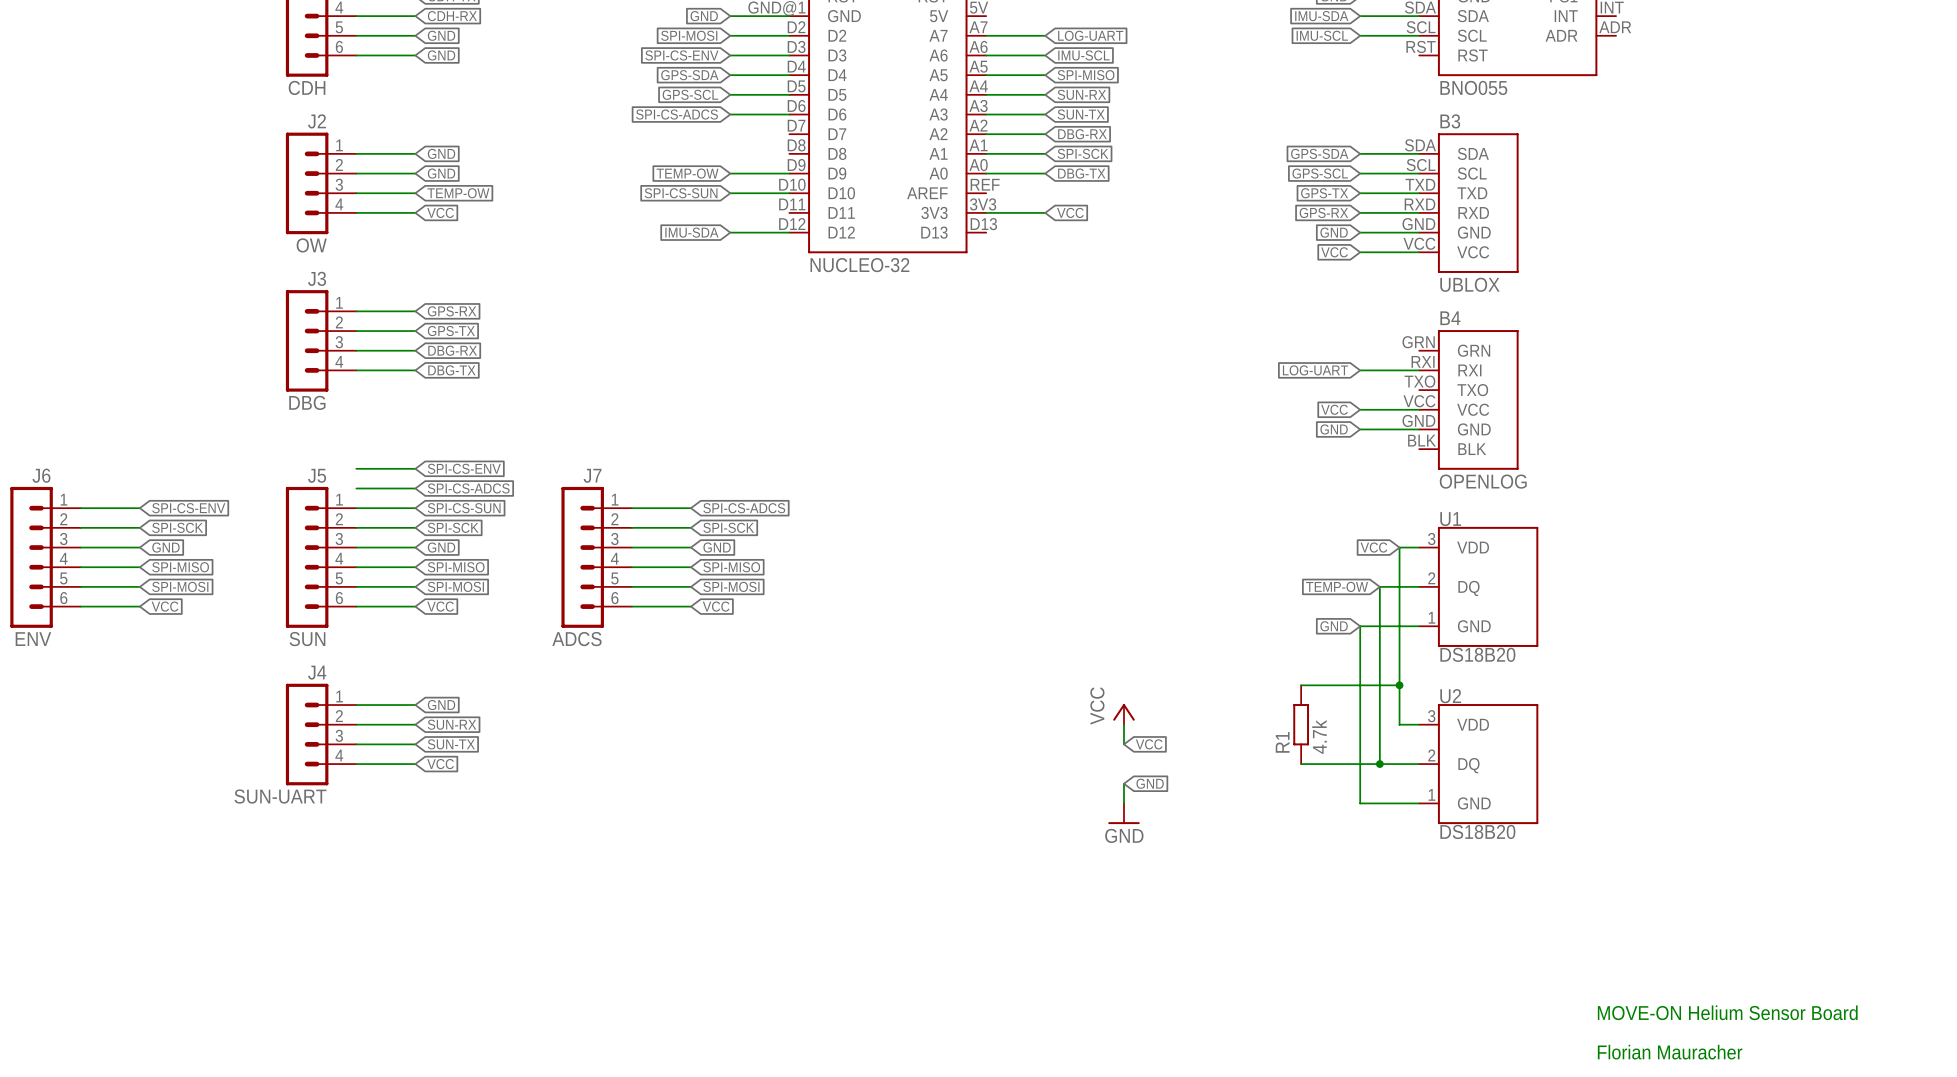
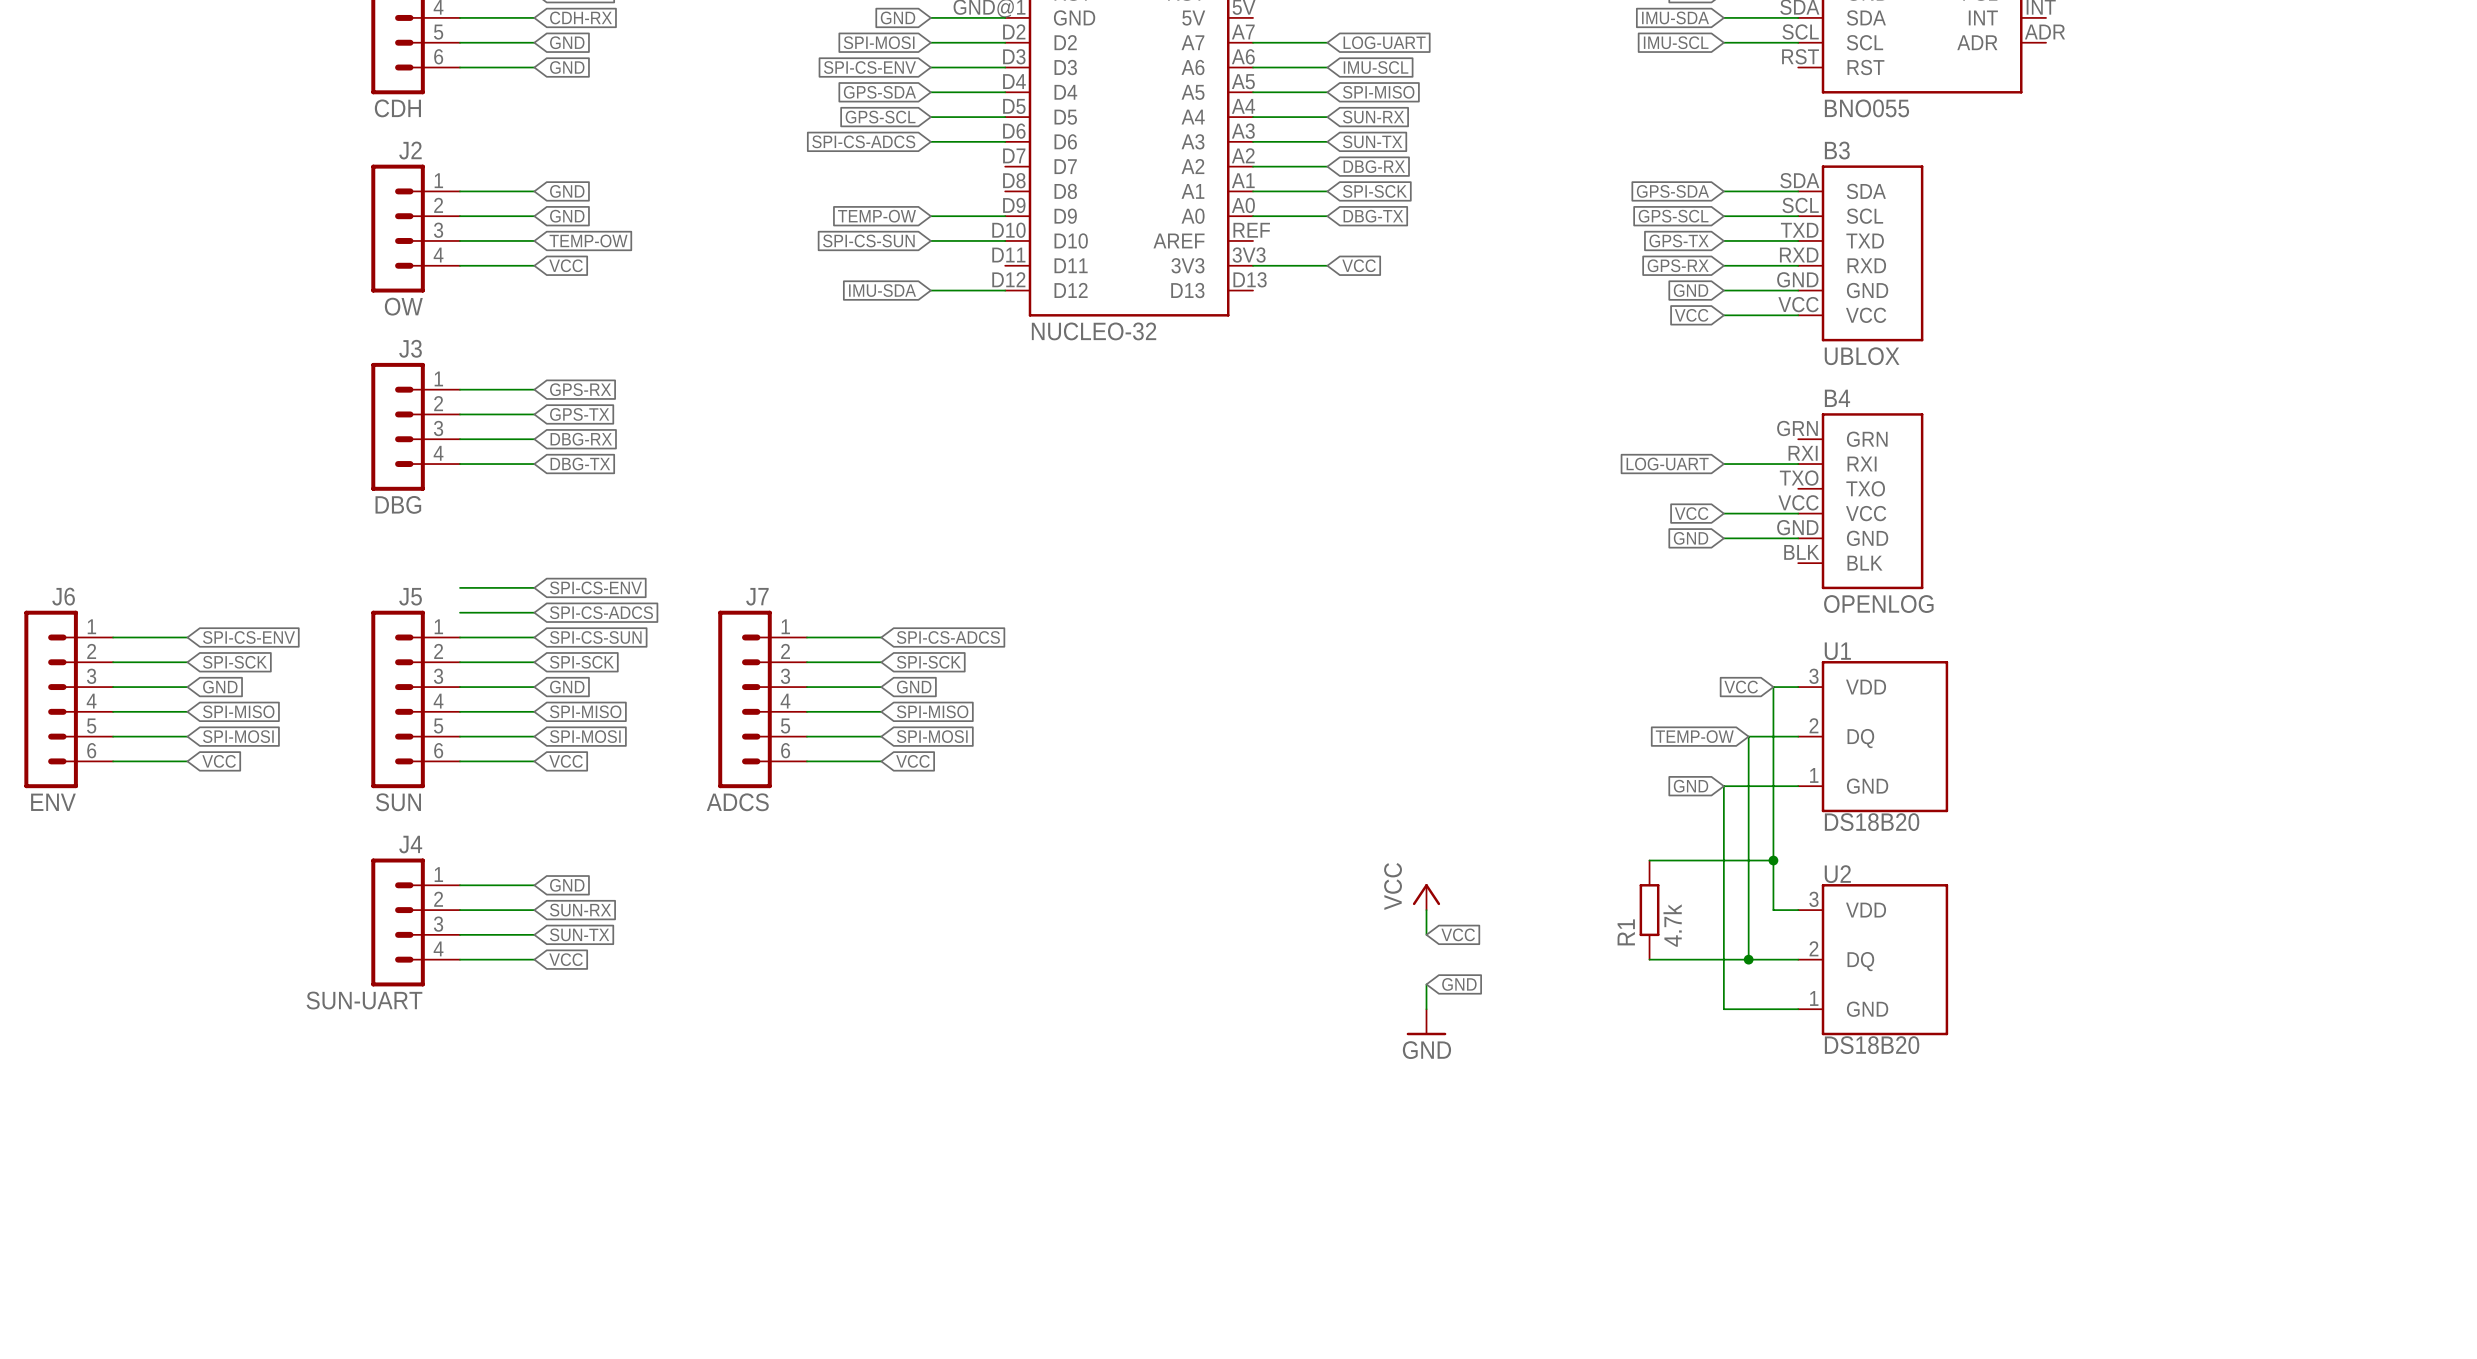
text: MOVE-ON Helium Sensor Board (1727, 1012) -> none
text: Florian Mauracher (1670, 1052) -> none

